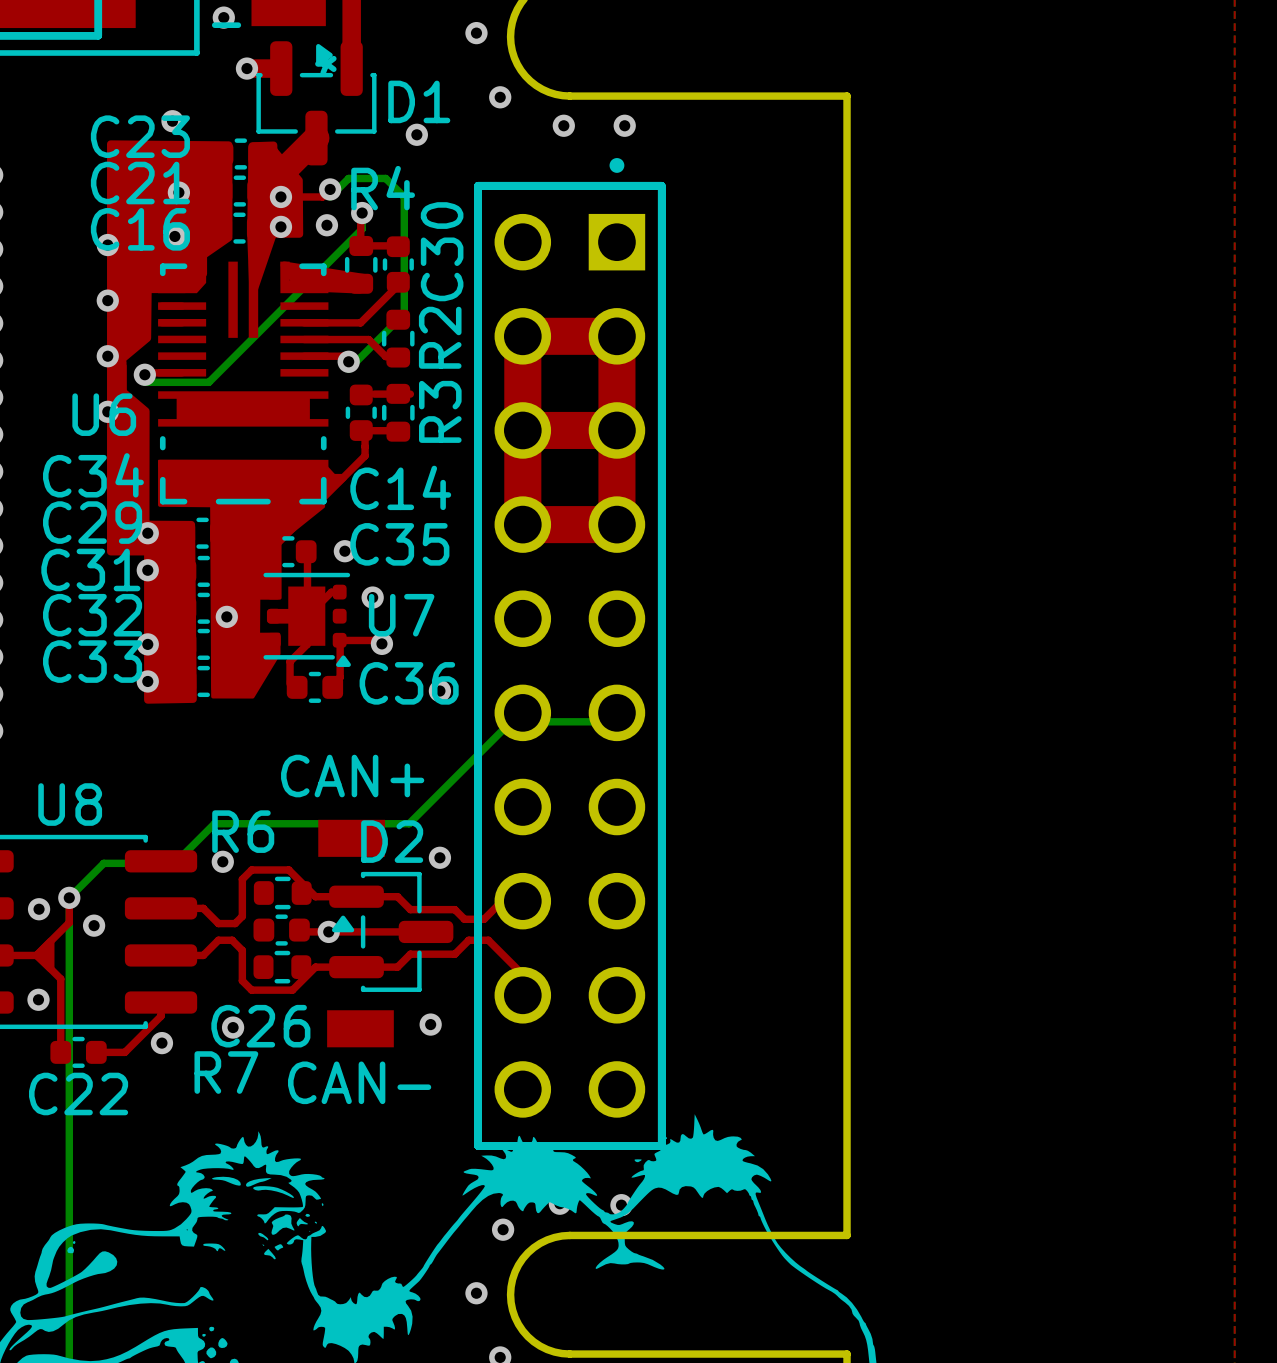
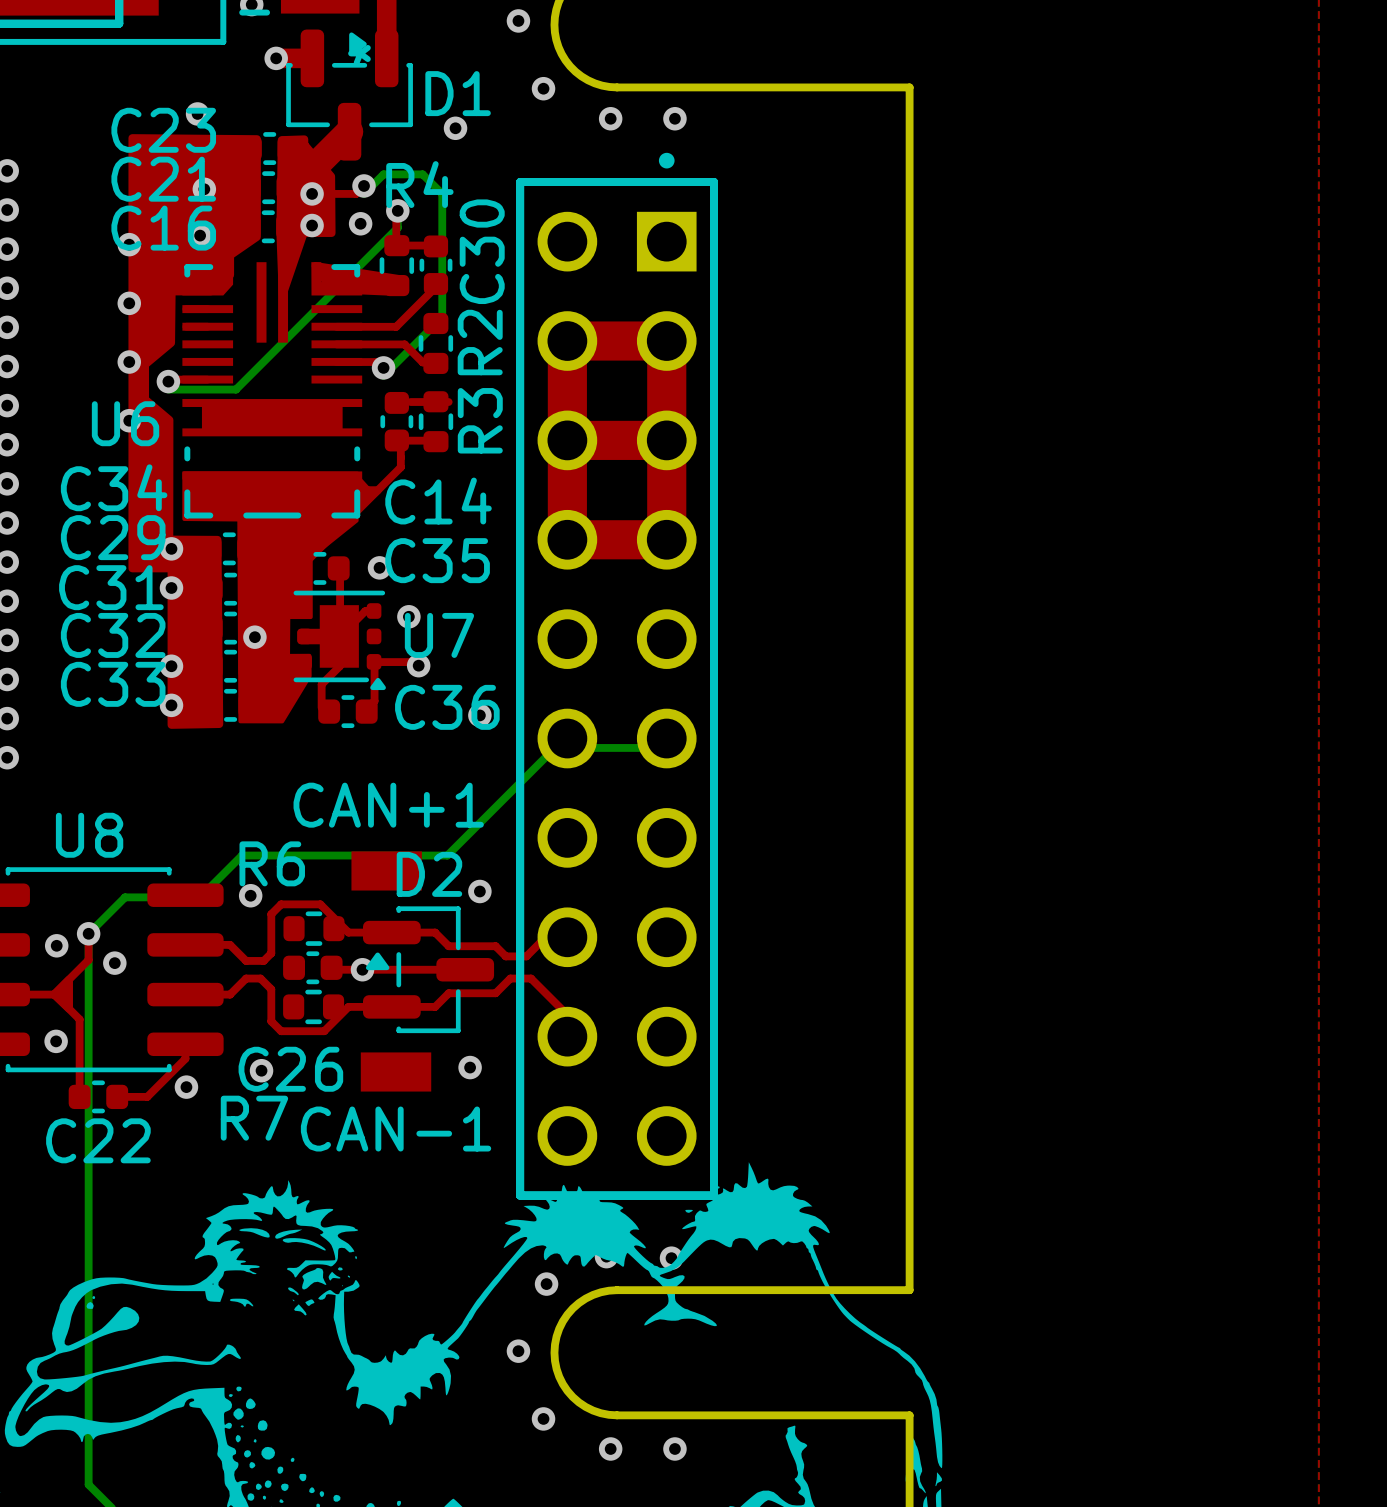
CAN+ name: CAN+ (352, 776) -> CAN+1 (388, 805)
CAN- name: CAN- (359, 1082) -> CAN-1 (396, 1129)

